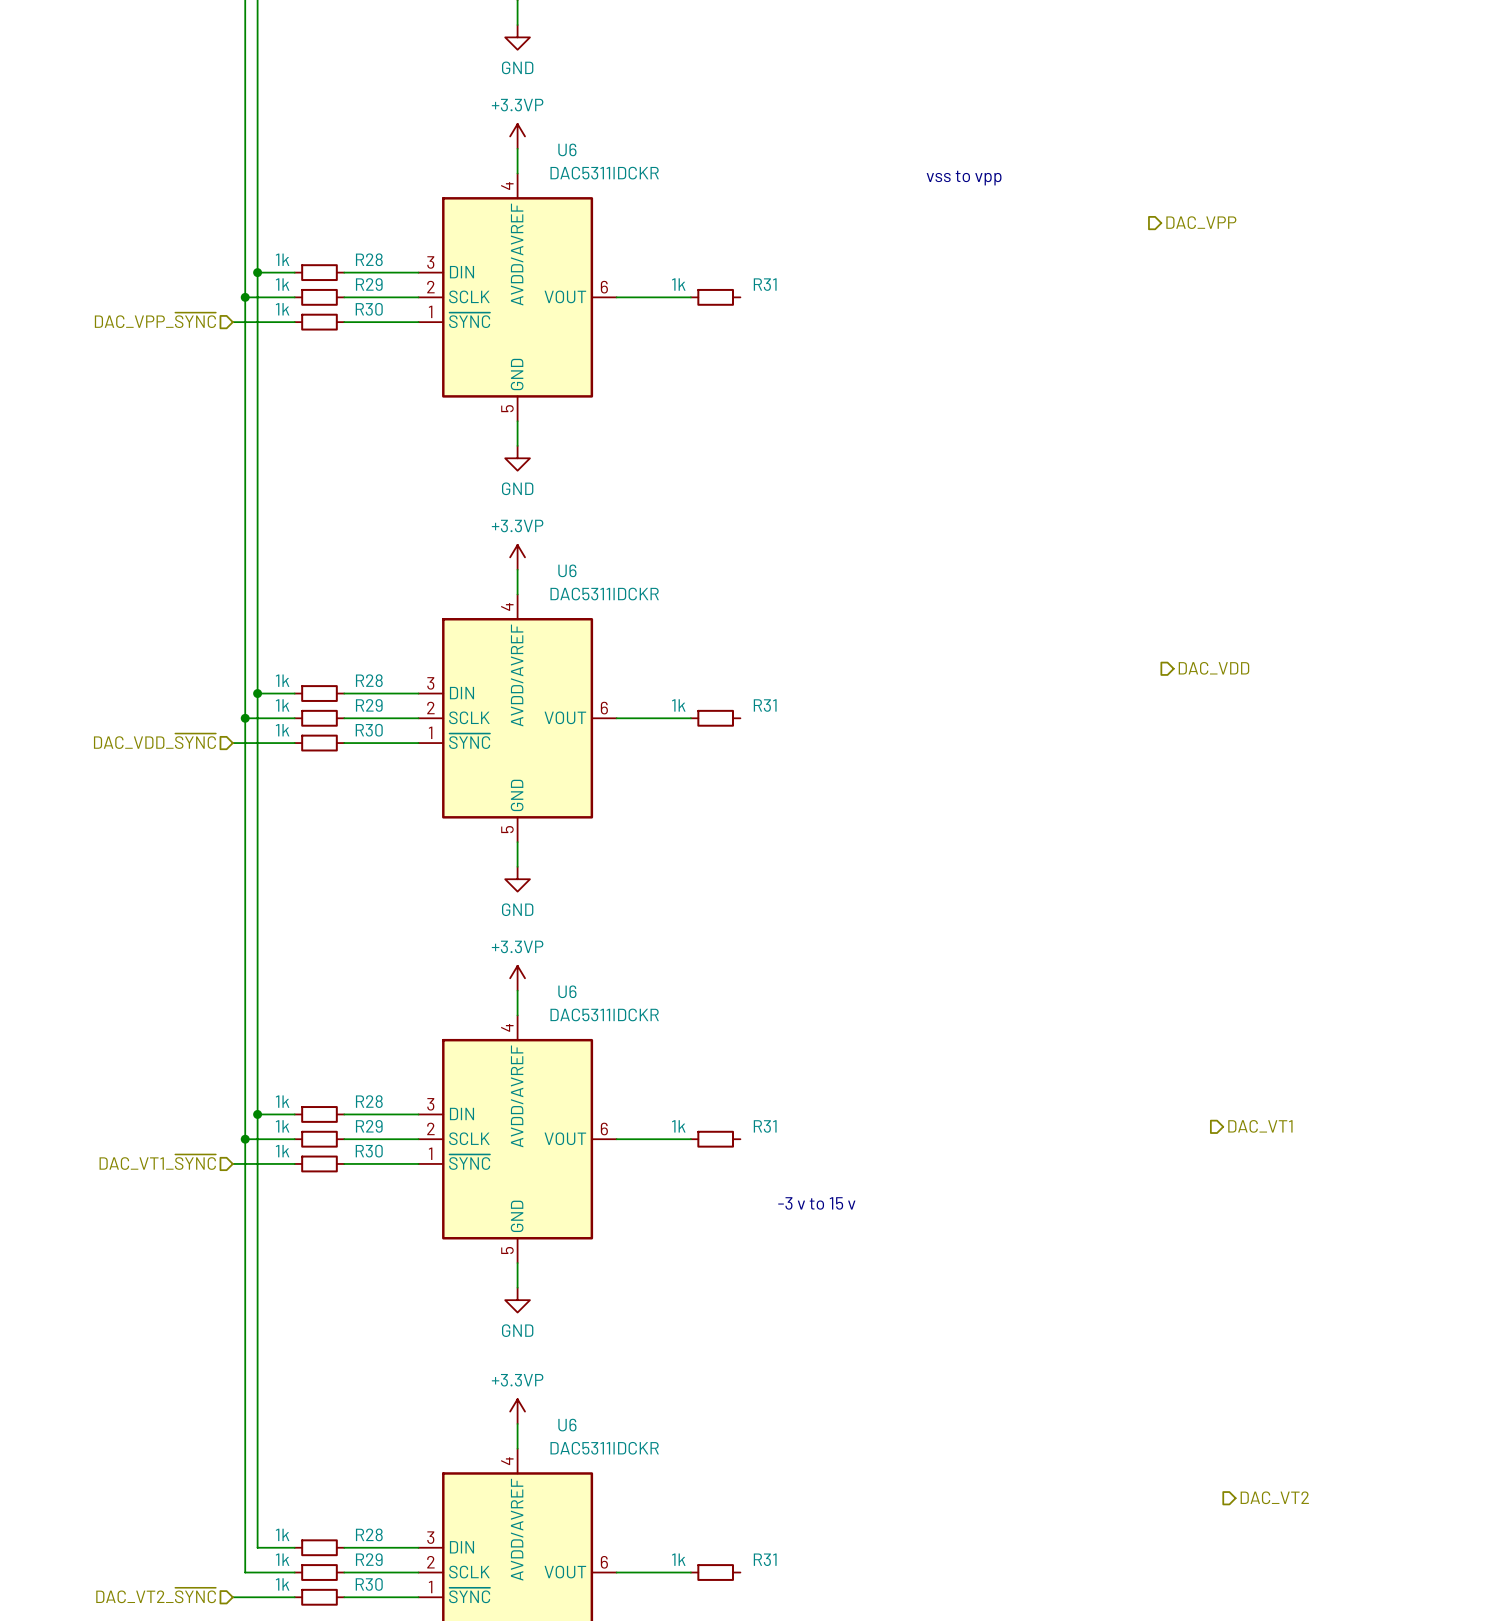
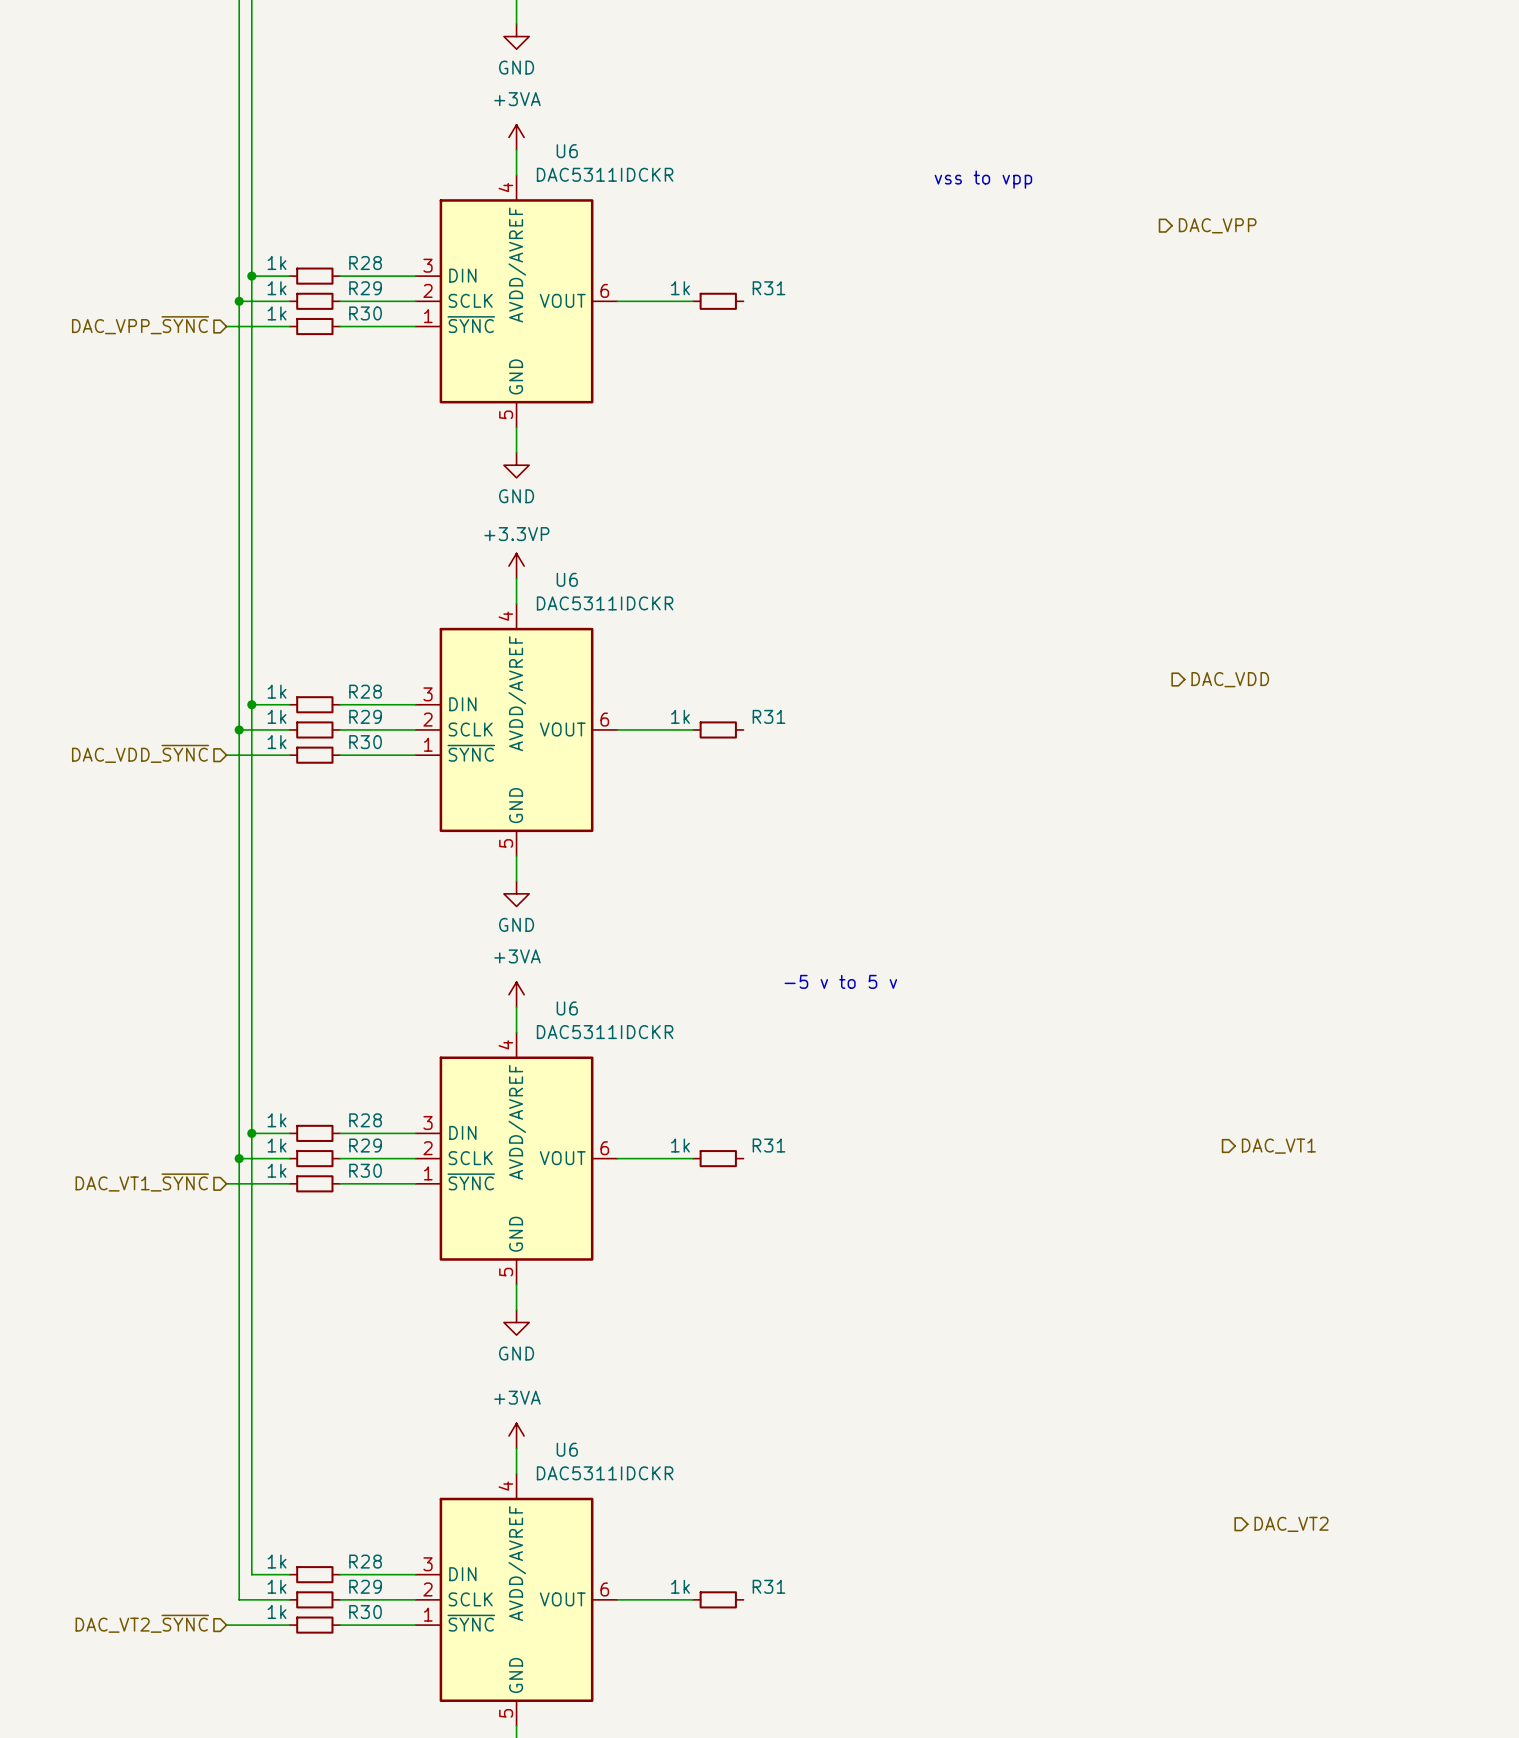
power symbol: +3.3VP (517, 136) -> +3VA (516, 137)
text: none -> -5 v to 5 v (840, 981)
power symbol: +3.3VP (517, 978) -> +3VA (516, 994)
text: -3 v to 15 v (816, 1203) -> none
power symbol: +3.3VP (517, 1411) -> +3VA (516, 1435)

